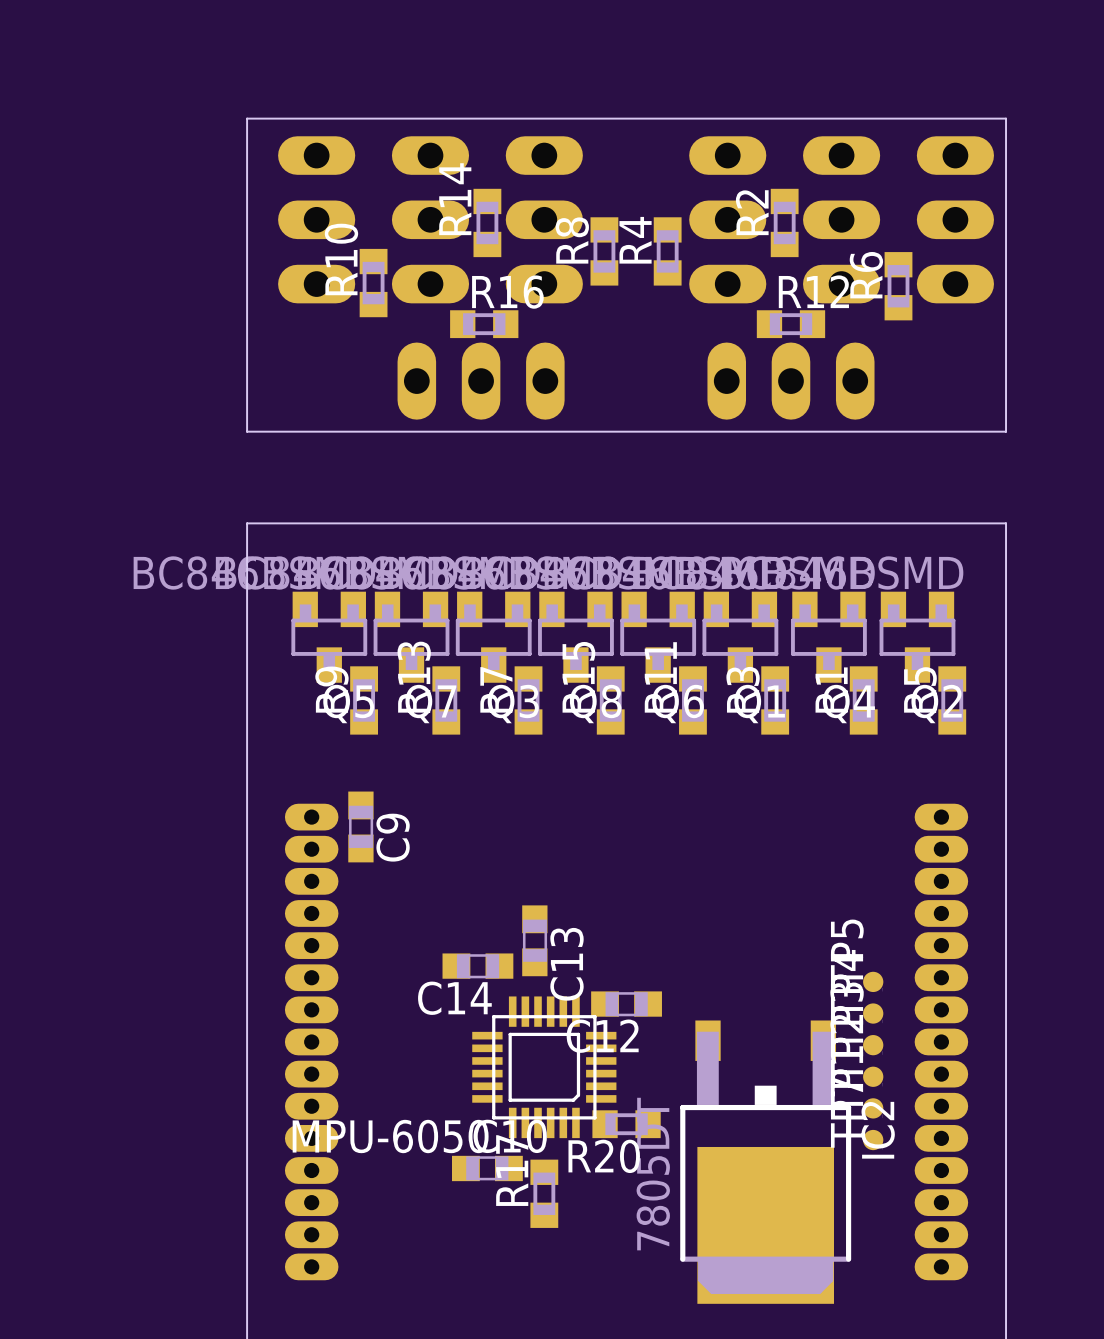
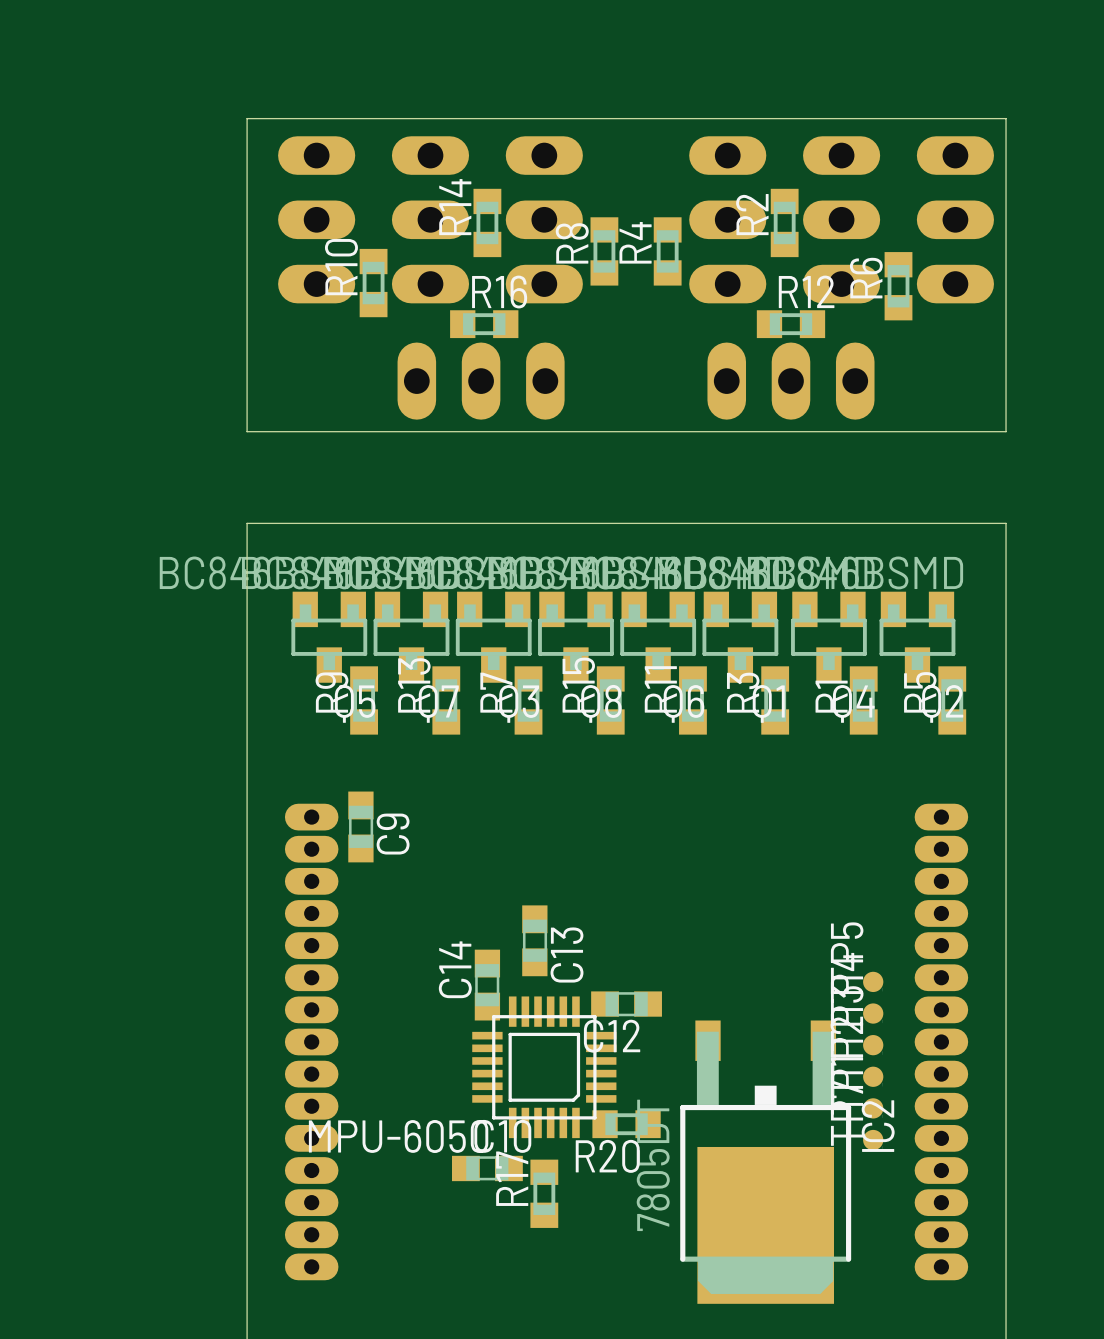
C14 rotation: 0° (477, 966) -> 90° clockwise (487, 985)

